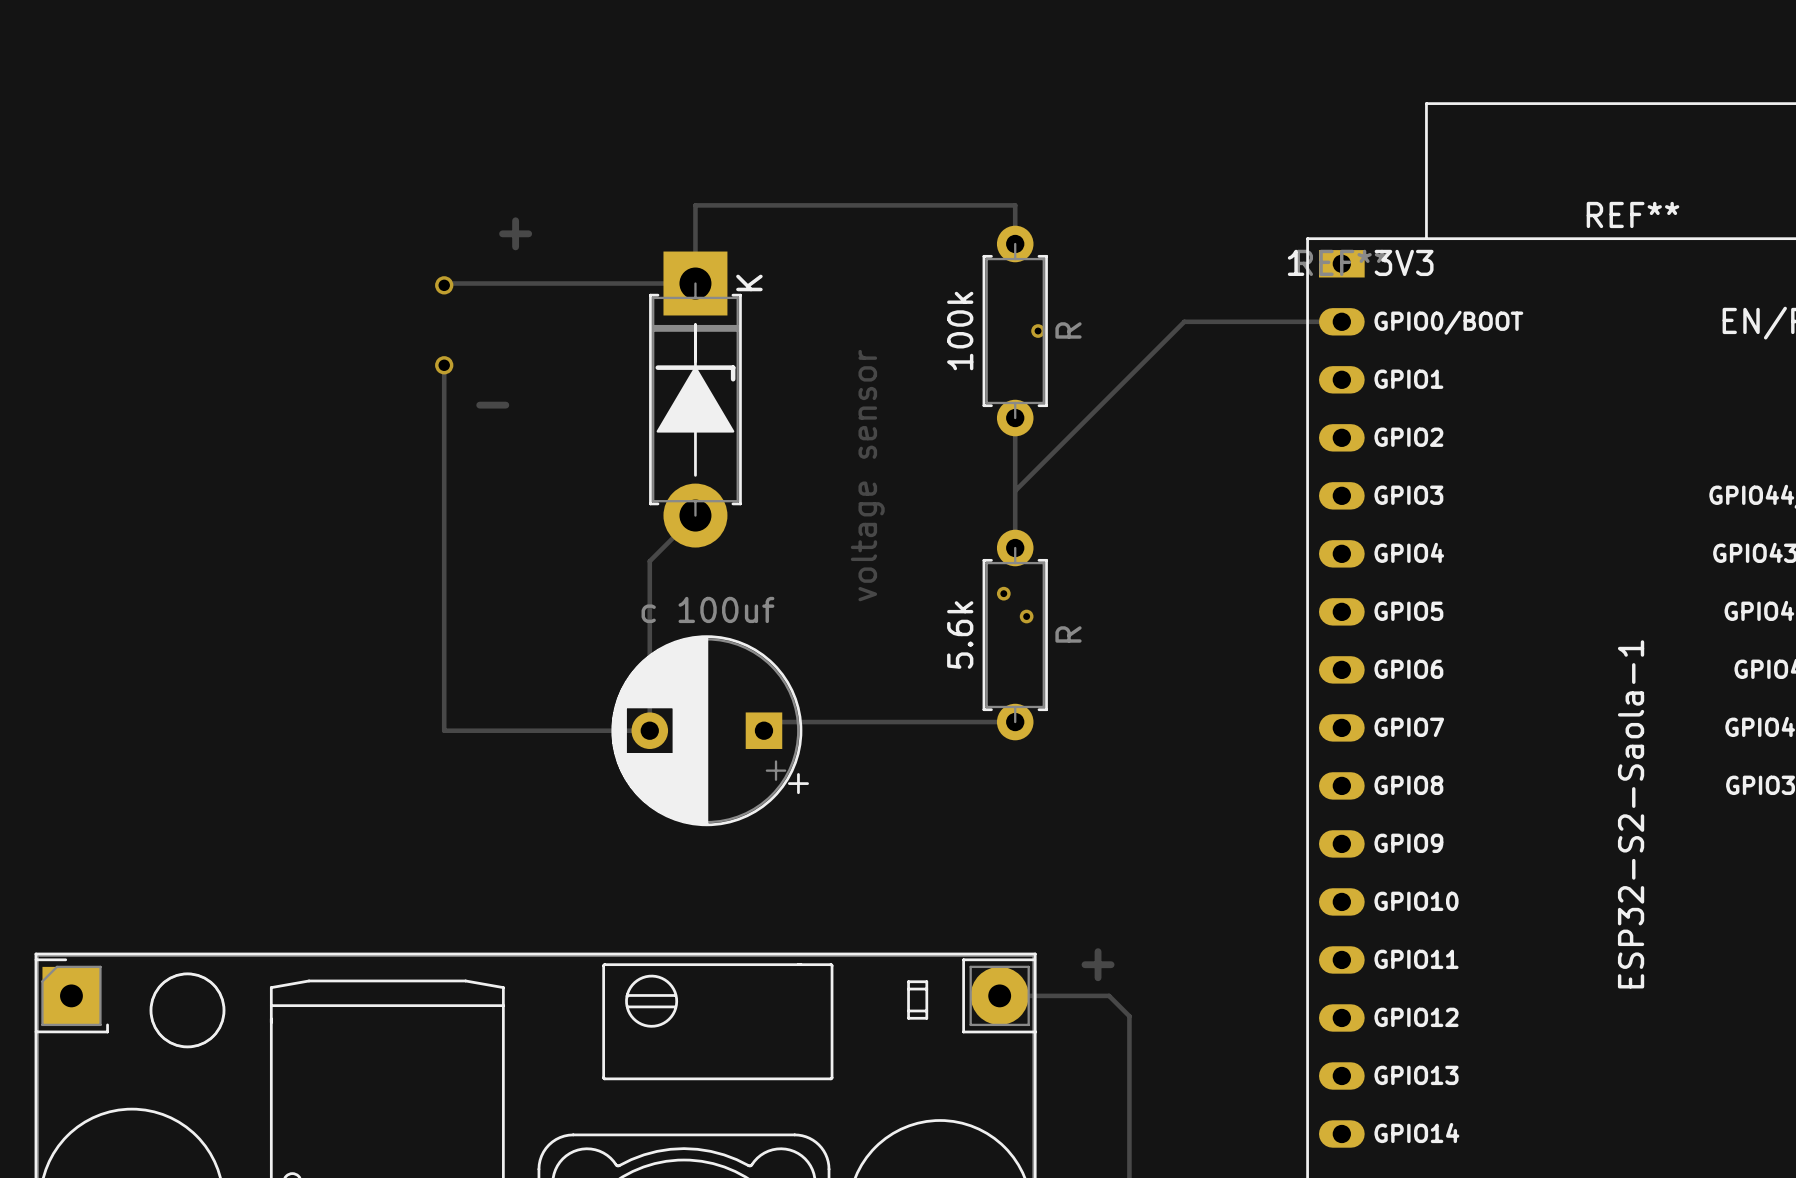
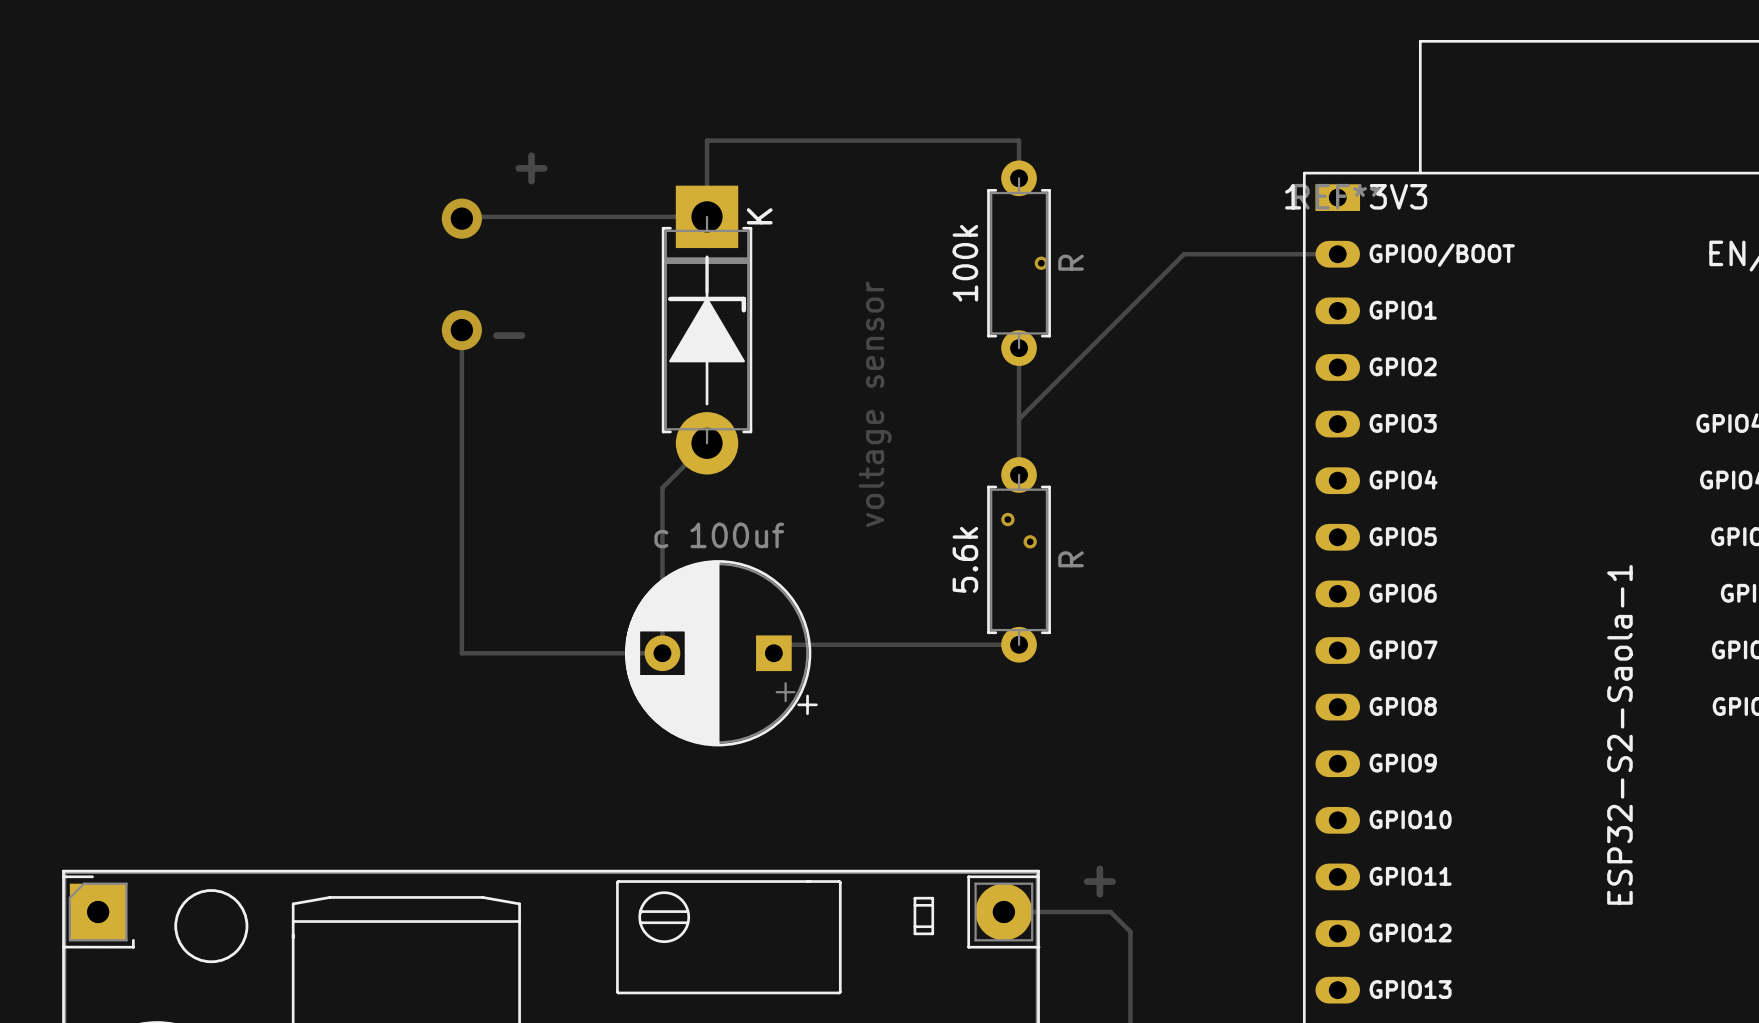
REF** name: REF** (1632, 214) -> none
via size: [435, 276, 454, 295] -> [441, 198, 482, 239]
track: (444, 365) (444, 399) -> none
via: (444, 365) -> none
via: none -> (461, 330)

